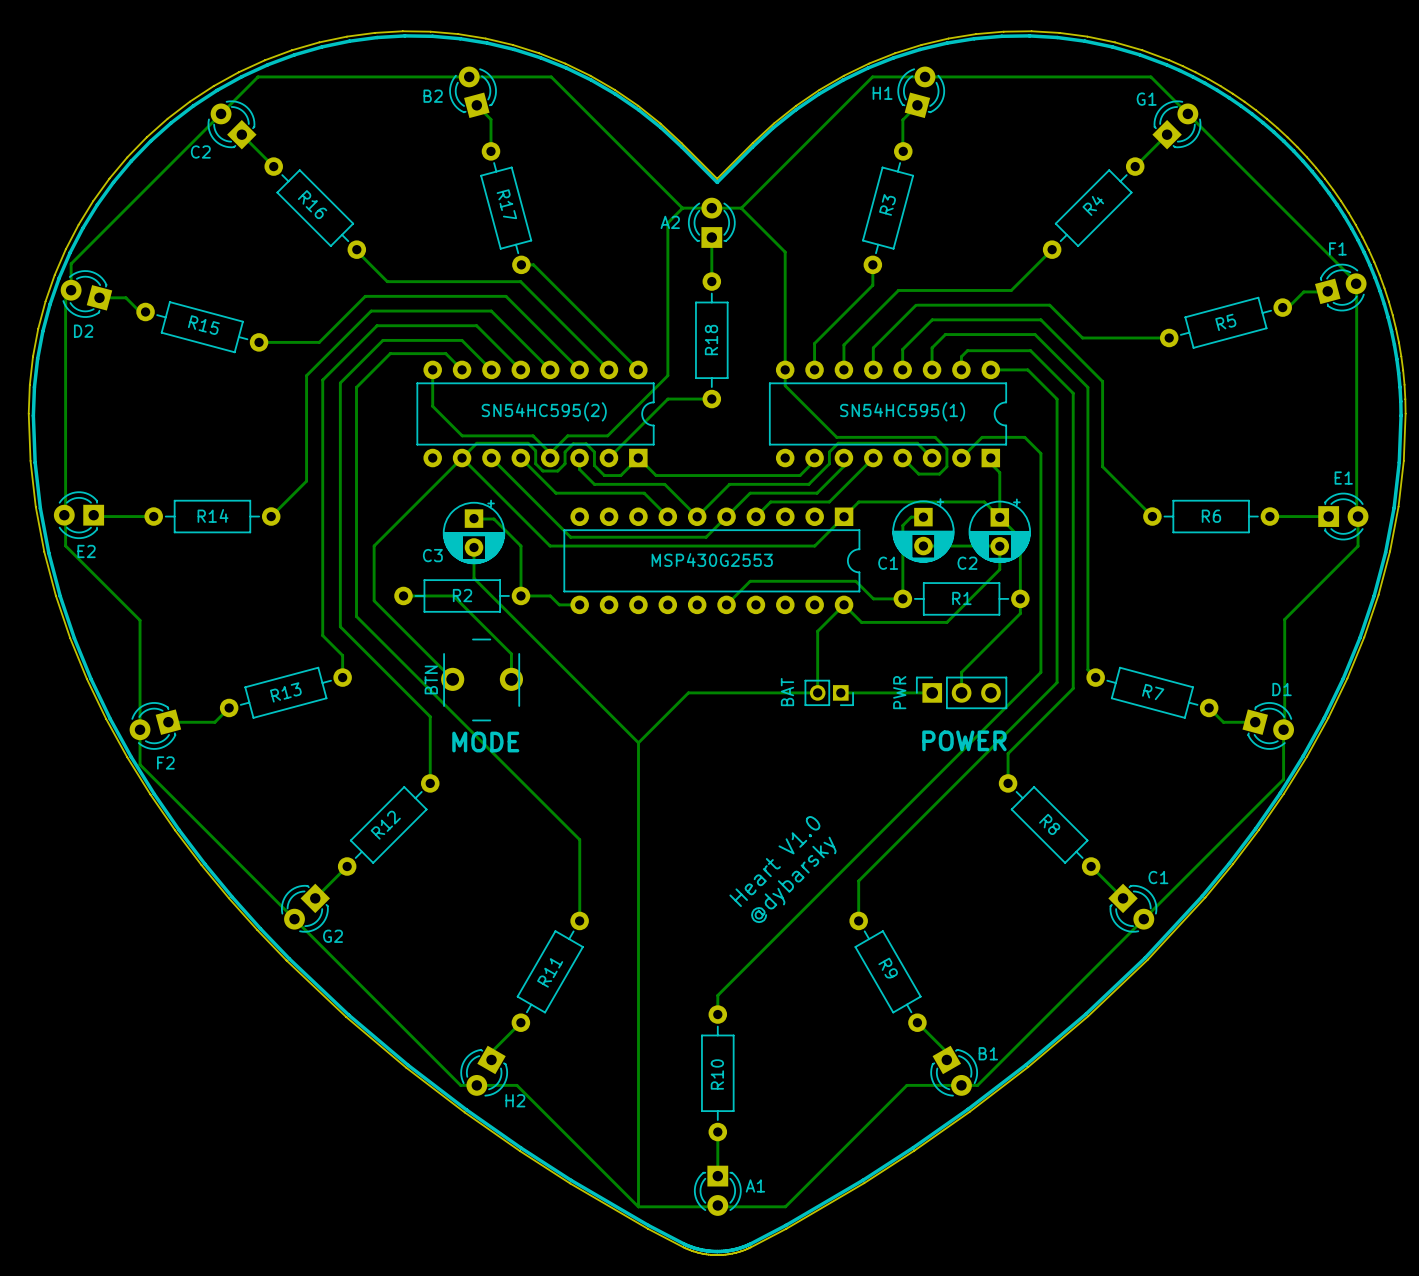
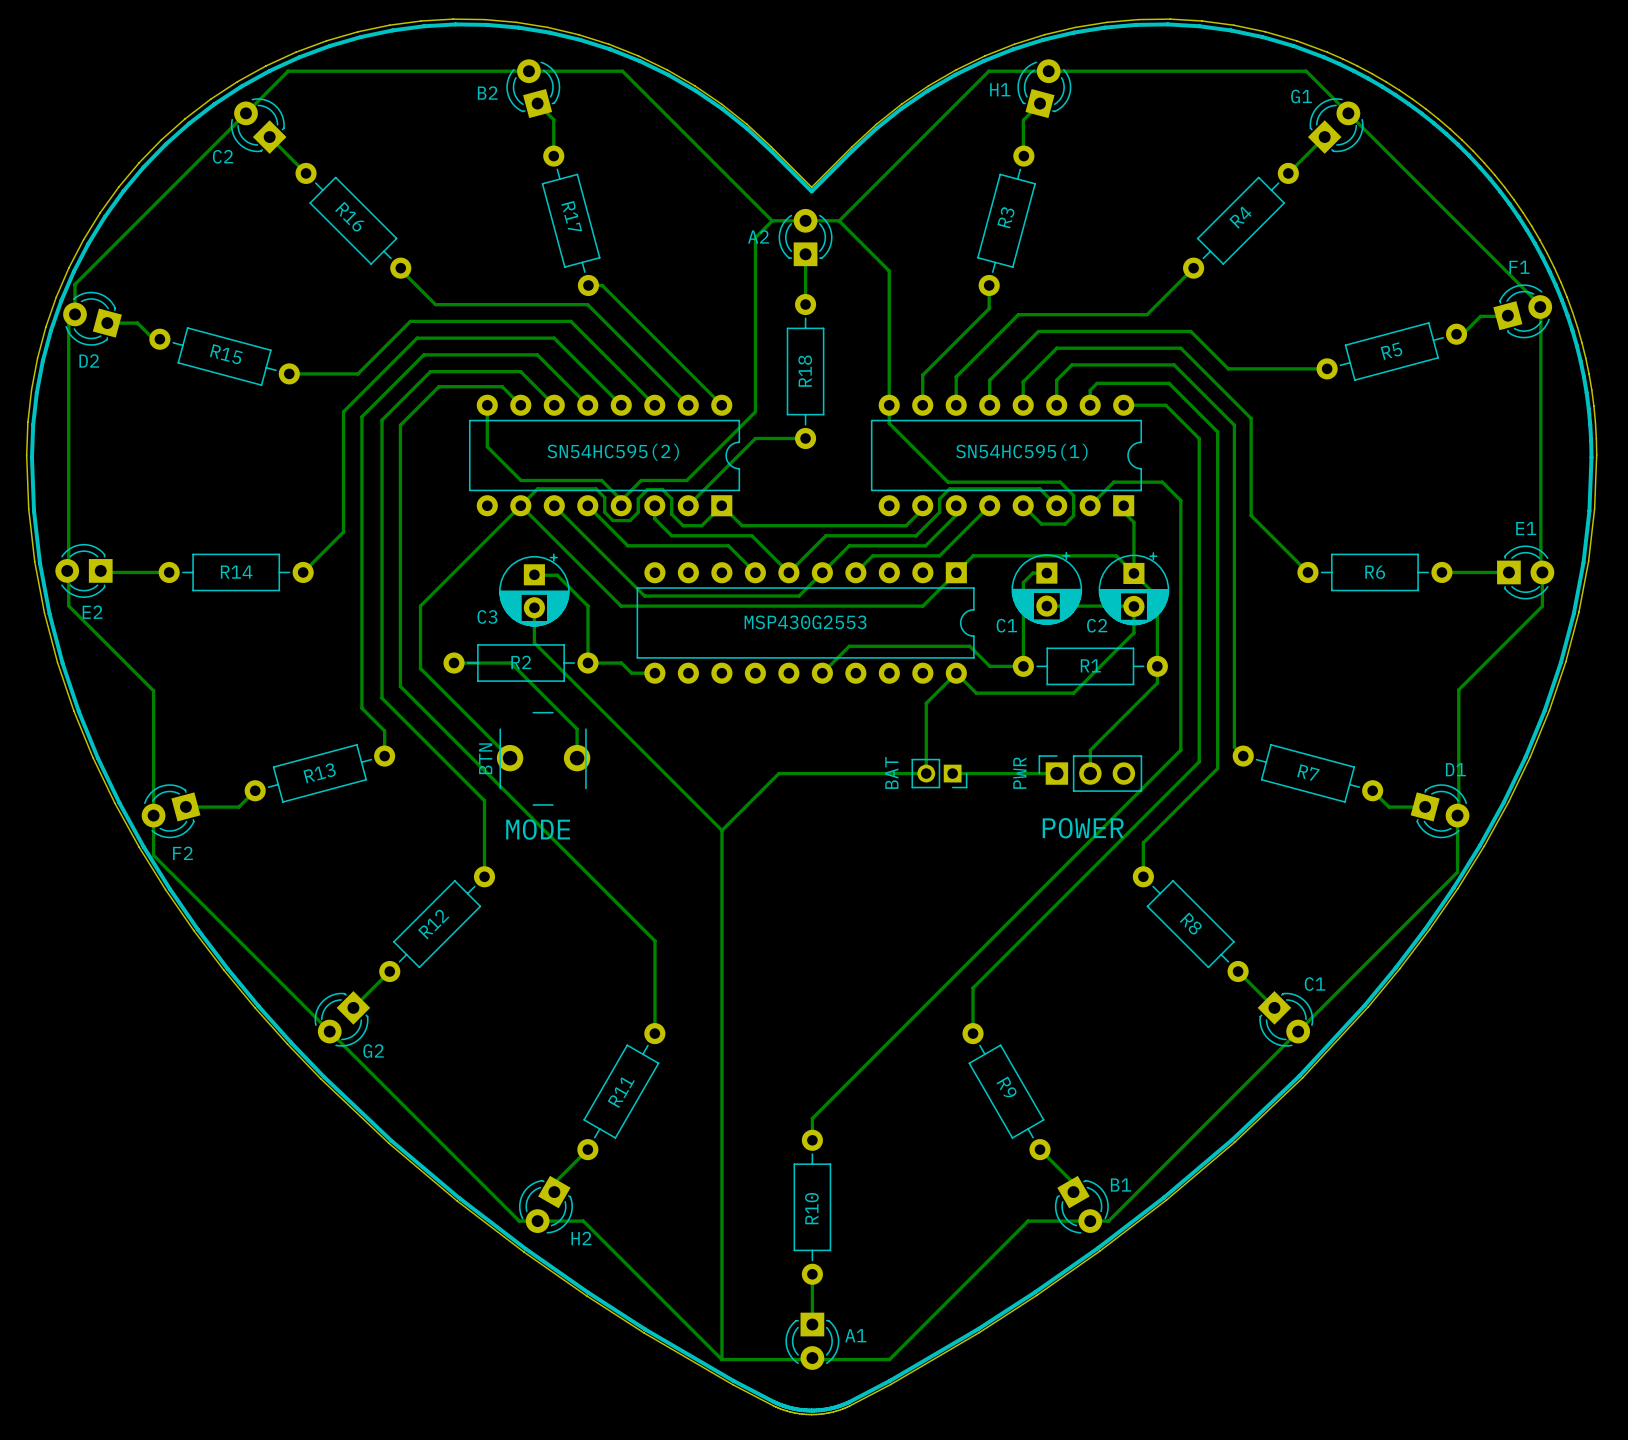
text: Heart V1.0 (774, 861) -> none
text: @dybarsky (793, 879) -> none

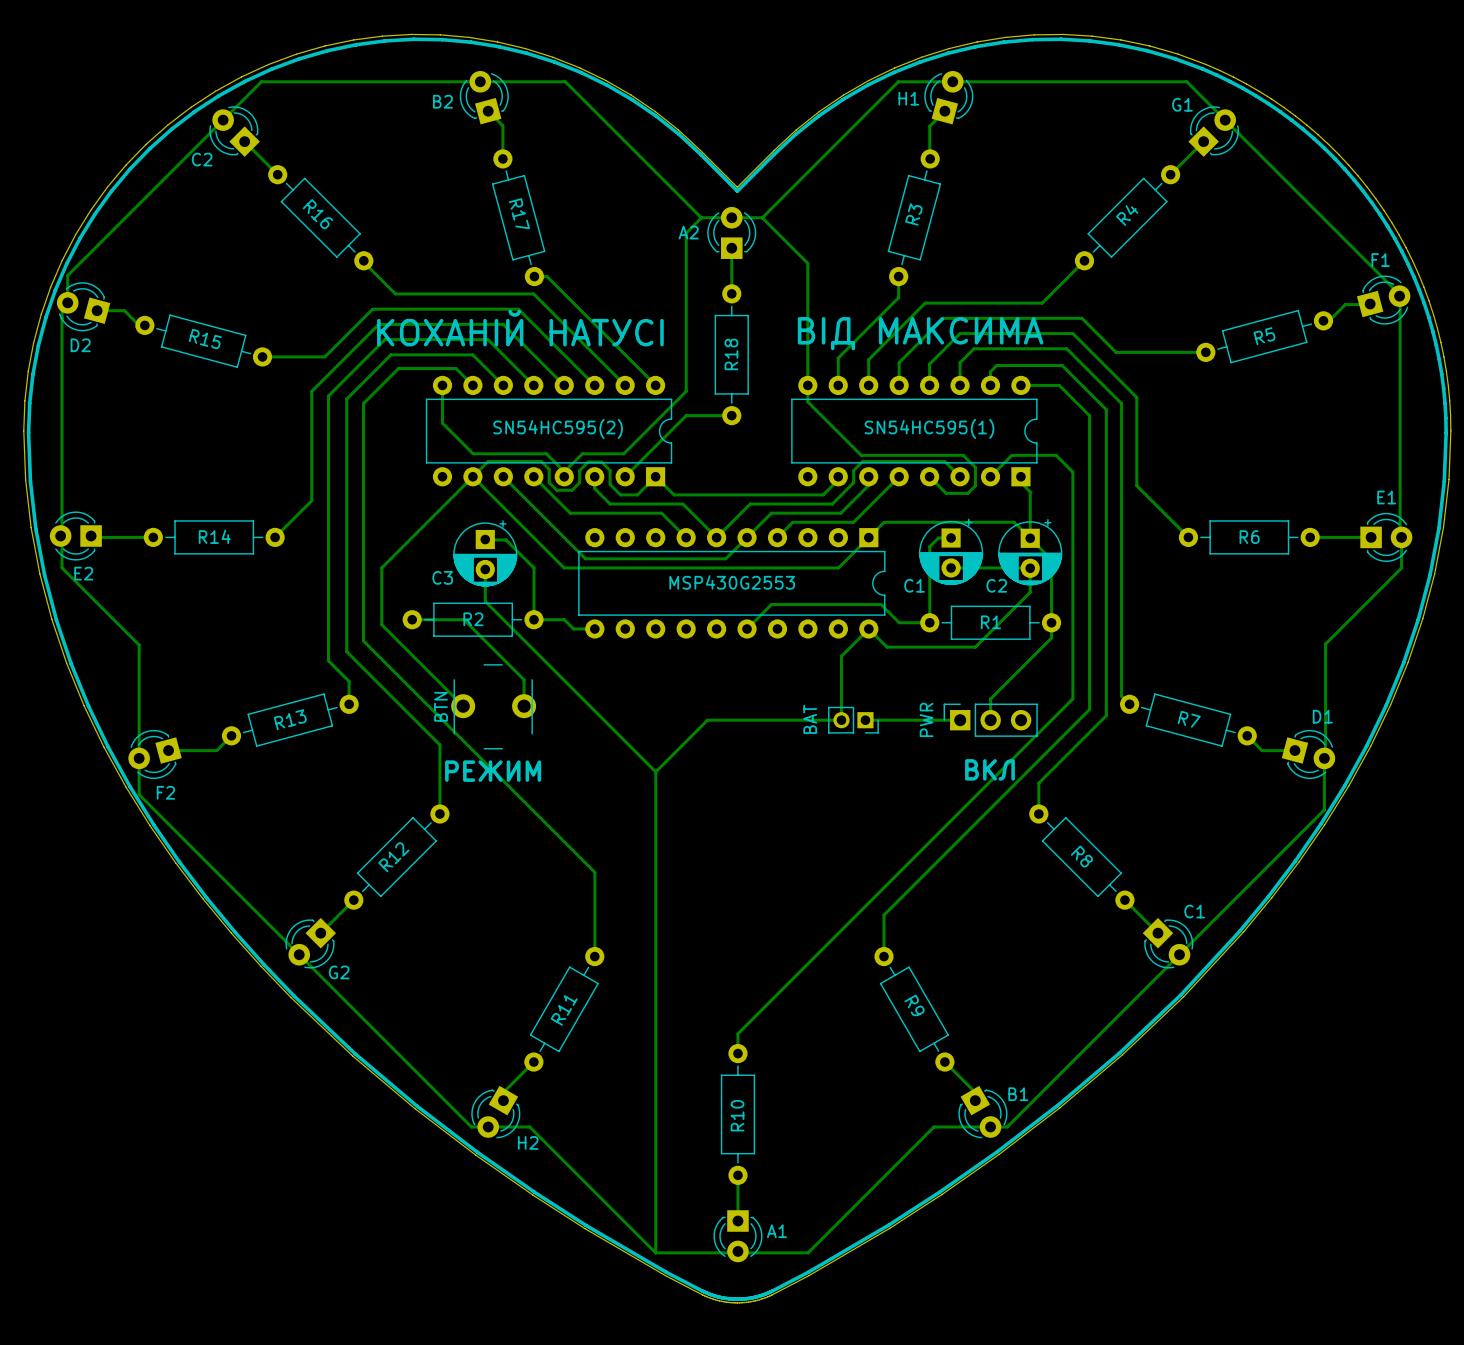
text: none -> КОХАНІЙ НАТУСІ (520, 328)
text: none -> ВІД МАКСИМА (920, 333)
text: none -> ВКЛ (989, 769)
text: POWER (1083, 828) -> none
text: none -> РЕЖИМ (493, 771)
text: MODE (538, 829) -> none

